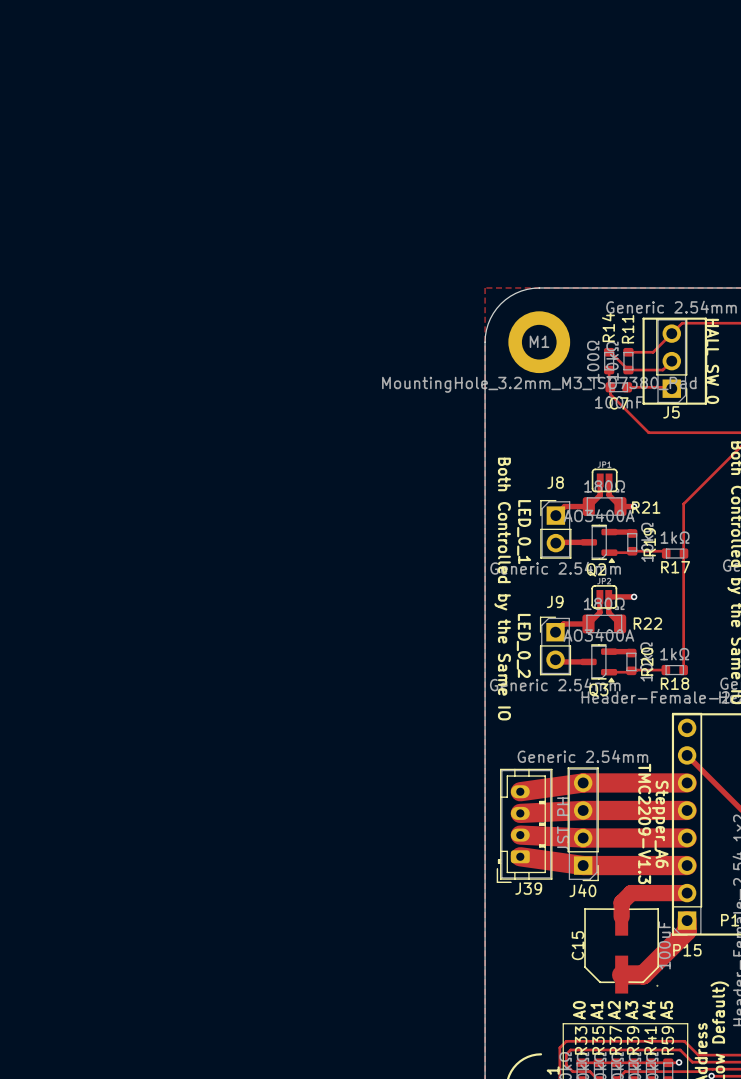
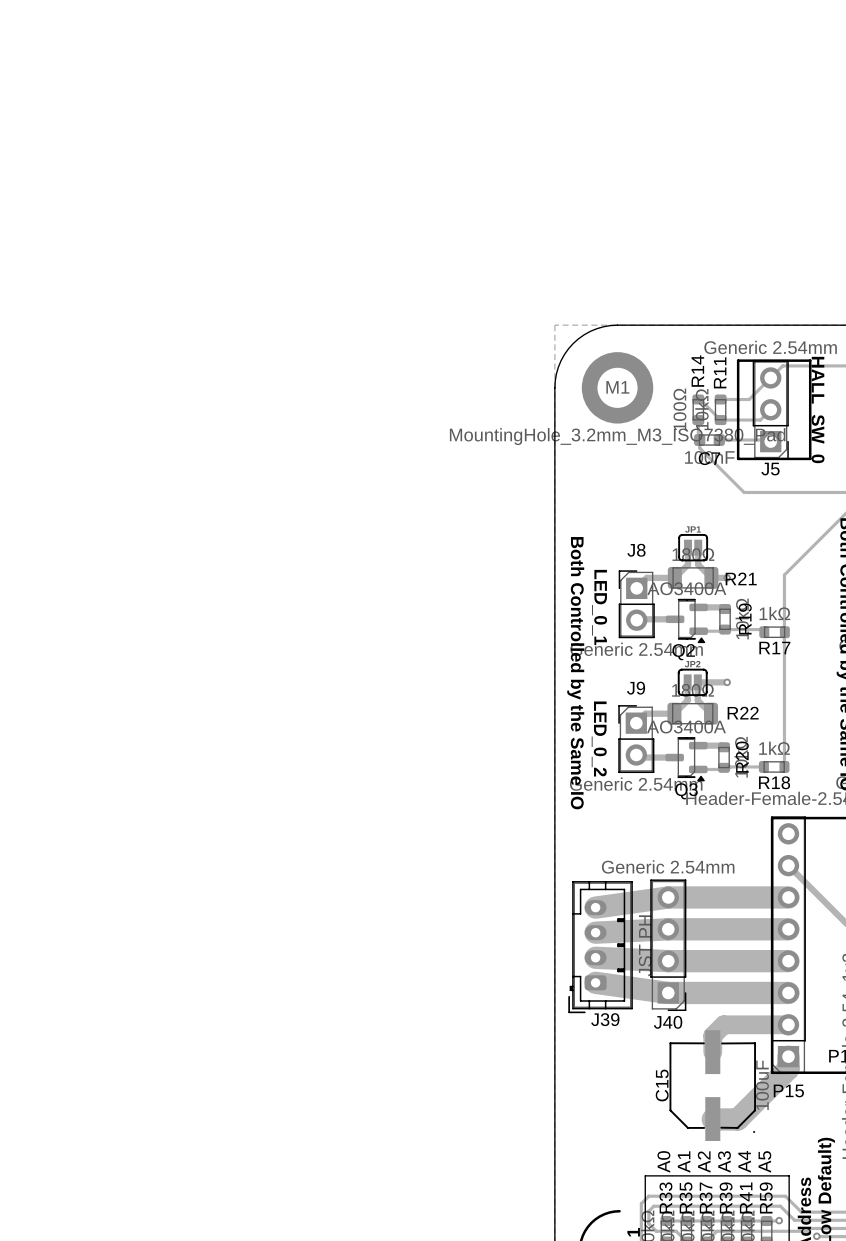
text: TMC2209-V1.3 (644, 823) -> none
text: Stepper_A6 (660, 824) -> none

